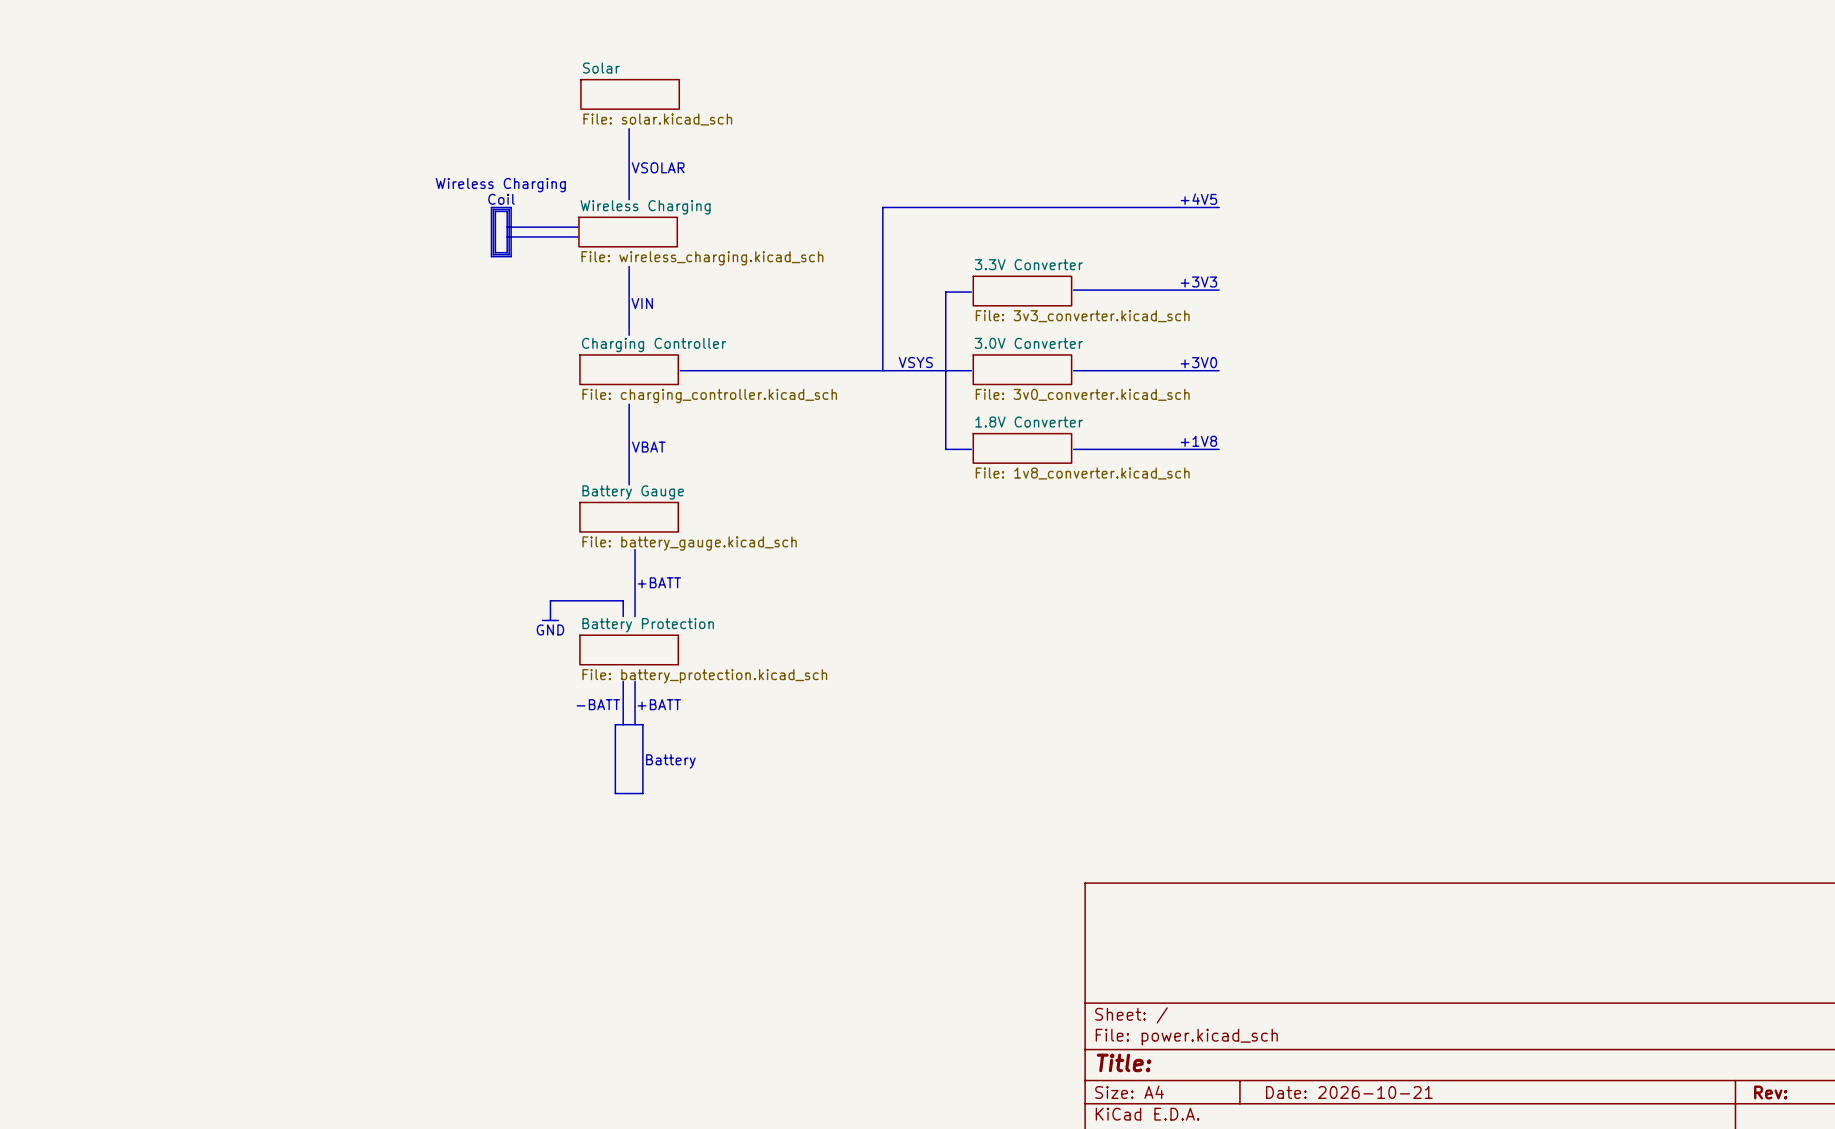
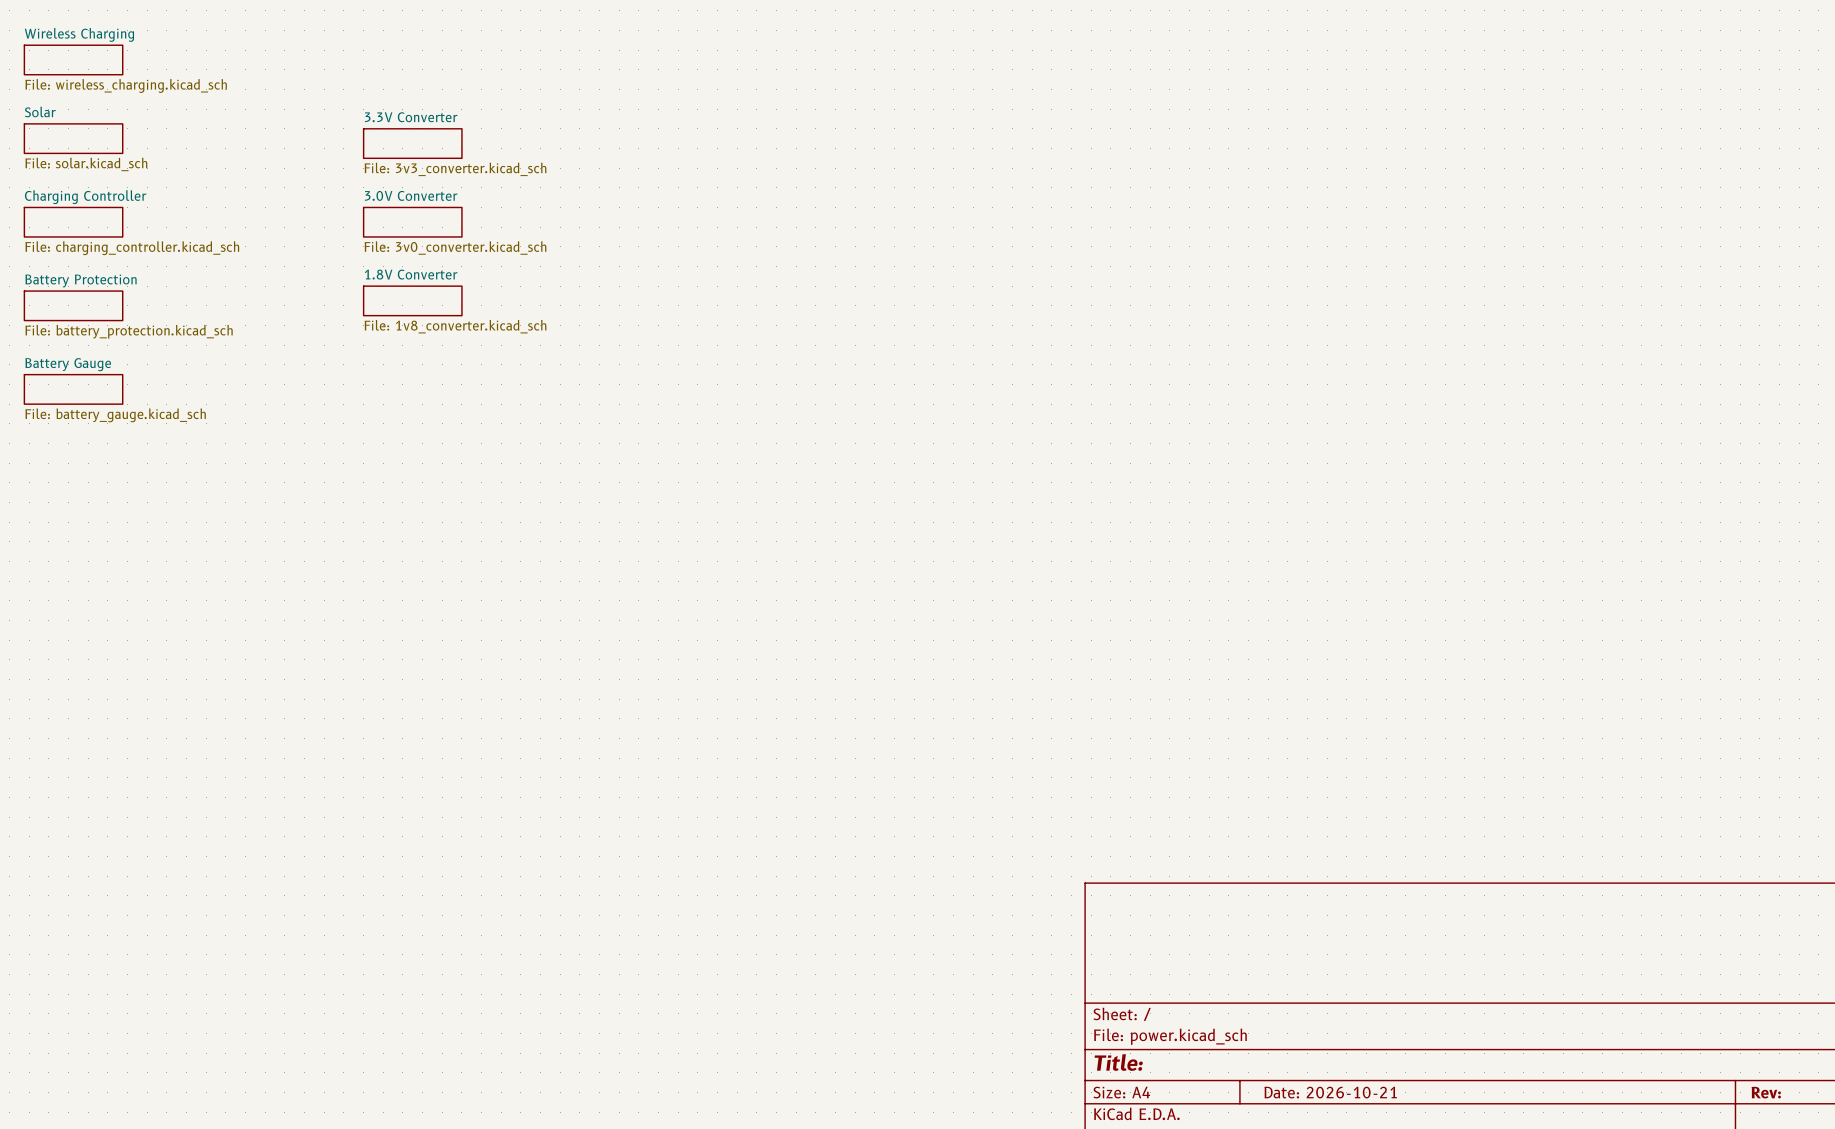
sheet Wireless Charging: none -> File: wireless_charging.kicad_sch (73, 59)
sheet Solar: File: solar.kicad_sch (630, 94) -> none
line: (629, 128) (629, 199) -> none
sheet Solar: none -> File: solar.kicad_sch (73, 138)
text: VSOLAR (658, 167) -> none
text: Wireless Charging (500, 185) -> none
text: Coil (501, 199) -> none
text: +4V5 (1198, 199) -> none
line: (491, 207) (511, 207) (511, 256) (491, 256) (491, 207) -> none
line: (1219, 207) (882, 207) (882, 370) -> none
line: (493, 209) (493, 254) (509, 254) (509, 209) (493, 209) -> none
line: (495, 211) (495, 252) (507, 252) (507, 211) (495, 211) -> none
sheet Charging Controller: none -> File: charging_controller.kicad_sch (73, 222)
line: (507, 227) (577, 227) -> none
sheet Wireless Charging: File: wireless_charging.kicad_sch (628, 232) -> none
line: (507, 236) (577, 236) -> none
line: (629, 266) (629, 335) -> none
text: +3V3 (1198, 282) -> none
line: (1073, 290) (1219, 290) -> none
sheet 3.3V Converter position: (1022, 291) -> (412, 143)
line: (971, 292) (945, 292) (945, 449) (971, 449) -> none
text: VIN (642, 303) -> none
sheet Battery Protection: none -> File: battery_protection.kicad_sch (73, 305)
text: VSYS (915, 362) -> none
text: +3V0 (1198, 362) -> none
sheet Charging Controller: File: charging_controller.kicad_sch (629, 369) -> none
sheet 3.0V Converter position: (1022, 369) -> (412, 222)
line: (680, 370) (971, 370) -> none
line: (1073, 370) (1219, 370) -> none
sheet Battery Gauge: none -> File: battery_gauge.kicad_sch (73, 389)
line: (629, 404) (629, 484) -> none
text: +1V8 (1198, 441) -> none
text: VBAT (648, 447) -> none
sheet 1.8V Converter position: (1022, 448) -> (412, 300)
line: (1073, 449) (1219, 449) -> none
sheet Battery Gauge: File: battery_gauge.kicad_sch (629, 517) -> none
line: (635, 549) (635, 616) -> none
text: +BATT (659, 582) -> none
line: (623, 616) (623, 600) (550, 600) (550, 620) -> none
line: (542, 620) (558, 620) -> none
text: GND (550, 629) -> none
sheet Battery Protection: File: battery_protection.kicad_sch (629, 649) -> none
line: (623, 681) (623, 724) -> none
line: (635, 681) (635, 724) -> none
text: -BATT (598, 704) -> none
text: +BATT (659, 704) -> none
line: (615, 724) (642, 724) (642, 793) (615, 793) (615, 724) -> none
text: Battery (670, 761) -> none

